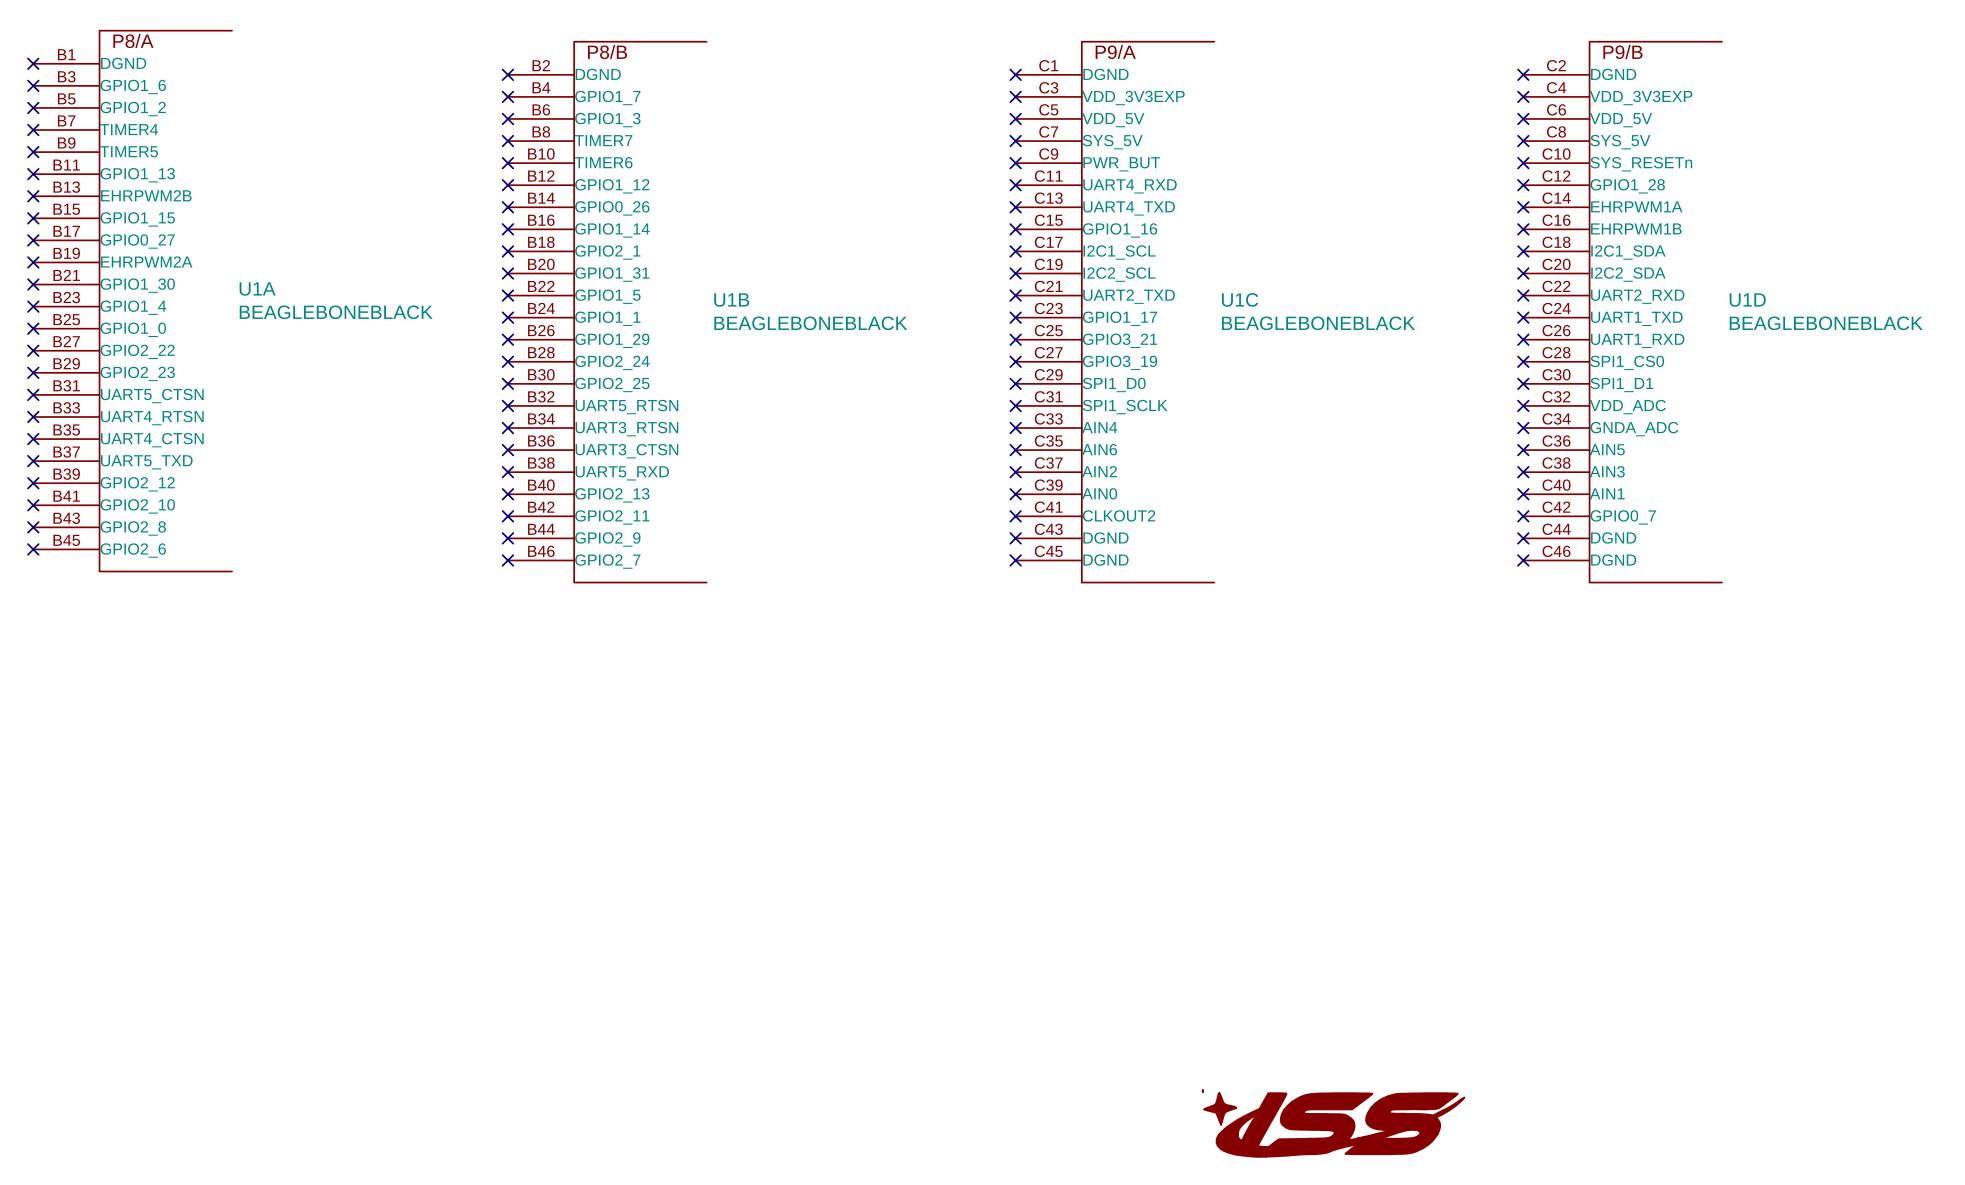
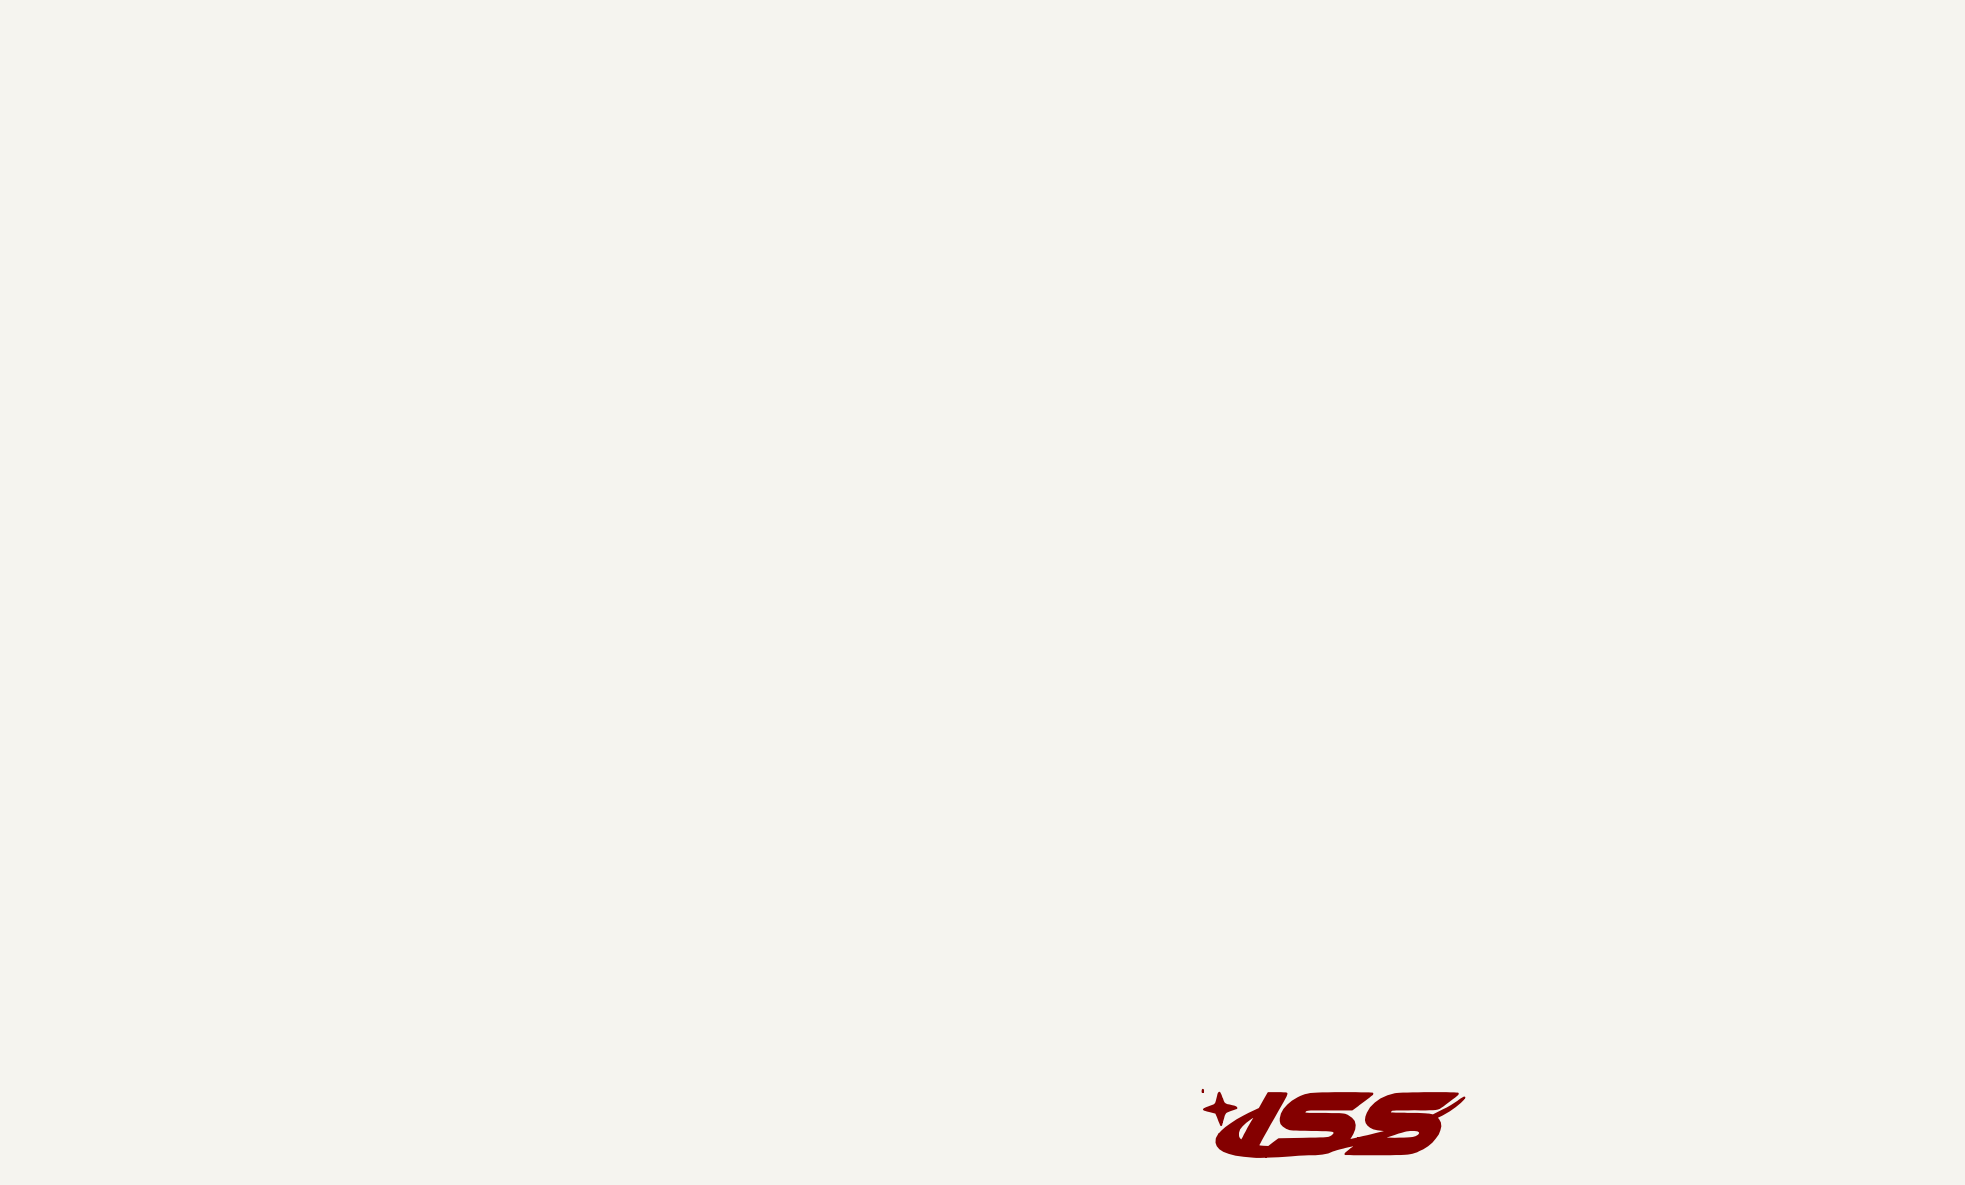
no-connect mark: (33, 63) -> none
no-connect mark: (507, 74) -> none
no-connect mark: (1015, 74) -> none
no-connect mark: (1523, 74) -> none
no-connect mark: (33, 85) -> none
no-connect mark: (507, 96) -> none
no-connect mark: (1015, 96) -> none
no-connect mark: (1523, 96) -> none
no-connect mark: (33, 107) -> none
no-connect mark: (507, 118) -> none
no-connect mark: (1015, 118) -> none
no-connect mark: (1523, 118) -> none
no-connect mark: (33, 130) -> none
no-connect mark: (507, 141) -> none
no-connect mark: (1015, 141) -> none
no-connect mark: (1523, 141) -> none
no-connect mark: (33, 152) -> none
no-connect mark: (507, 163) -> none
no-connect mark: (1015, 163) -> none
no-connect mark: (1523, 163) -> none
no-connect mark: (33, 174) -> none
no-connect mark: (507, 185) -> none
no-connect mark: (1015, 185) -> none
no-connect mark: (1523, 185) -> none
no-connect mark: (33, 196) -> none
no-connect mark: (507, 207) -> none
no-connect mark: (1015, 207) -> none
no-connect mark: (1523, 207) -> none
no-connect mark: (33, 218) -> none
no-connect mark: (507, 229) -> none
no-connect mark: (1015, 229) -> none
no-connect mark: (1523, 229) -> none
no-connect mark: (33, 240) -> none
no-connect mark: (507, 251) -> none
no-connect mark: (1015, 251) -> none
no-connect mark: (1523, 251) -> none
no-connect mark: (33, 262) -> none
no-connect mark: (507, 273) -> none
no-connect mark: (1015, 273) -> none
no-connect mark: (1523, 273) -> none
no-connect mark: (33, 284) -> none
no-connect mark: (507, 295) -> none
no-connect mark: (1015, 295) -> none
no-connect mark: (1523, 295) -> none
U1A: BEAGLEBONEBLACK (132, 301) -> none
no-connect mark: (33, 306) -> none
U1B: BEAGLEBONEBLACK (607, 312) -> none
U1C: BEAGLEBONEBLACK (1114, 312) -> none
U1D: BEAGLEBONEBLACK (1622, 312) -> none
no-connect mark: (507, 317) -> none
no-connect mark: (1015, 317) -> none
no-connect mark: (1523, 317) -> none
no-connect mark: (33, 328) -> none
no-connect mark: (507, 339) -> none
no-connect mark: (1015, 339) -> none
no-connect mark: (1523, 339) -> none
no-connect mark: (33, 350) -> none
no-connect mark: (507, 361) -> none
no-connect mark: (1015, 361) -> none
no-connect mark: (1523, 361) -> none
no-connect mark: (33, 372) -> none
no-connect mark: (507, 383) -> none
no-connect mark: (1015, 383) -> none
no-connect mark: (1523, 383) -> none
no-connect mark: (33, 394) -> none
no-connect mark: (507, 405) -> none
no-connect mark: (1015, 405) -> none
no-connect mark: (1523, 405) -> none
no-connect mark: (33, 416) -> none
no-connect mark: (507, 428) -> none
no-connect mark: (1015, 428) -> none
no-connect mark: (1523, 428) -> none
no-connect mark: (33, 439) -> none
no-connect mark: (507, 450) -> none
no-connect mark: (1015, 450) -> none
no-connect mark: (1523, 450) -> none
no-connect mark: (33, 461) -> none
no-connect mark: (507, 472) -> none
no-connect mark: (1015, 472) -> none
no-connect mark: (1523, 472) -> none
no-connect mark: (33, 483) -> none
no-connect mark: (507, 494) -> none
no-connect mark: (1015, 494) -> none
no-connect mark: (1523, 494) -> none
no-connect mark: (33, 505) -> none
no-connect mark: (507, 516) -> none
no-connect mark: (1015, 516) -> none
no-connect mark: (1523, 516) -> none
no-connect mark: (33, 527) -> none
no-connect mark: (507, 538) -> none
no-connect mark: (1015, 538) -> none
no-connect mark: (1523, 538) -> none
no-connect mark: (33, 549) -> none
no-connect mark: (507, 560) -> none
no-connect mark: (1015, 560) -> none
no-connect mark: (1523, 560) -> none

